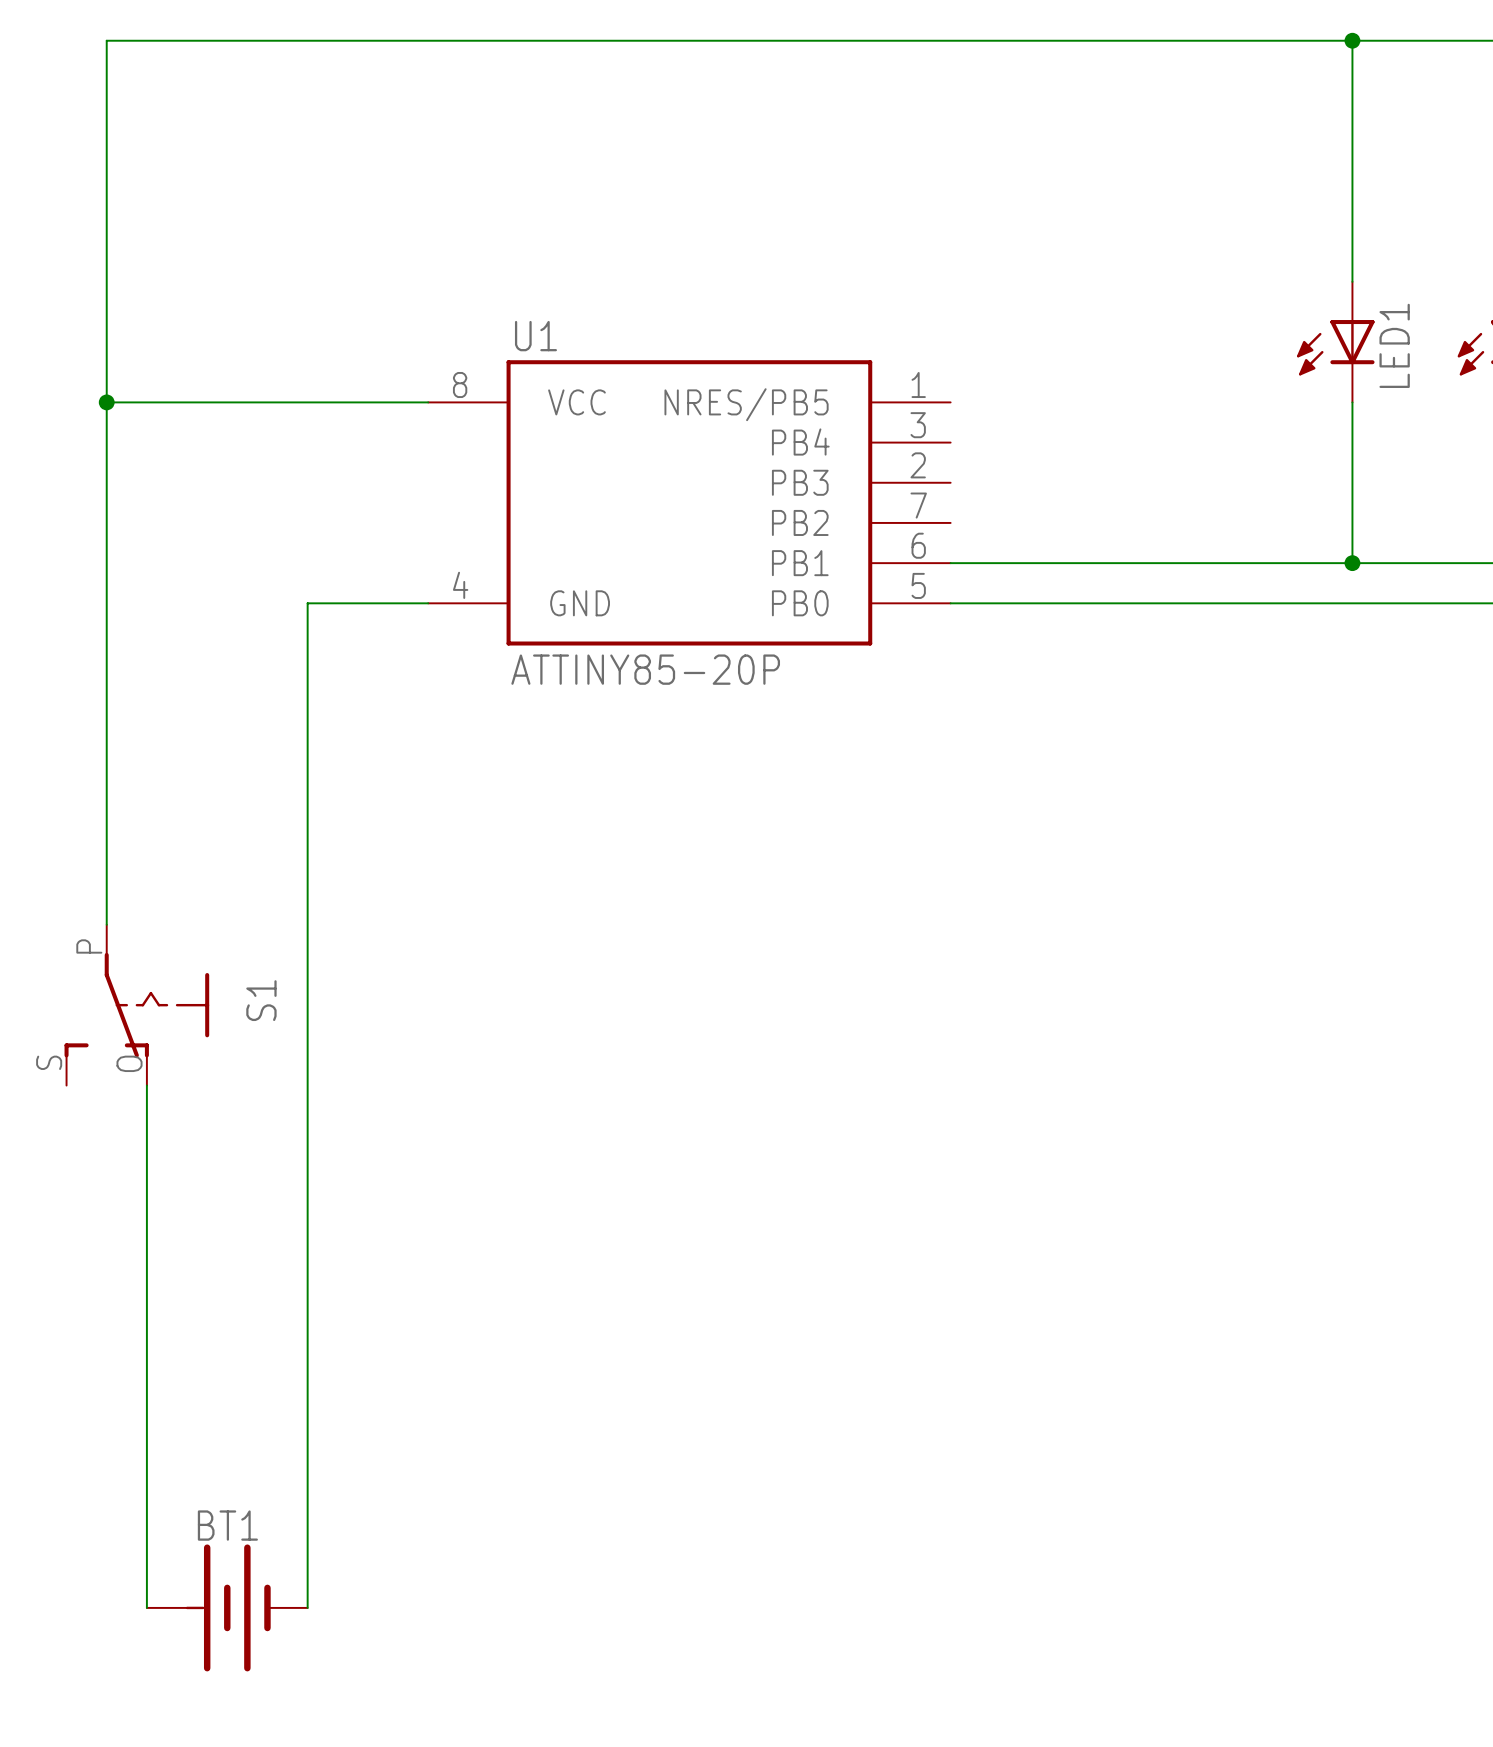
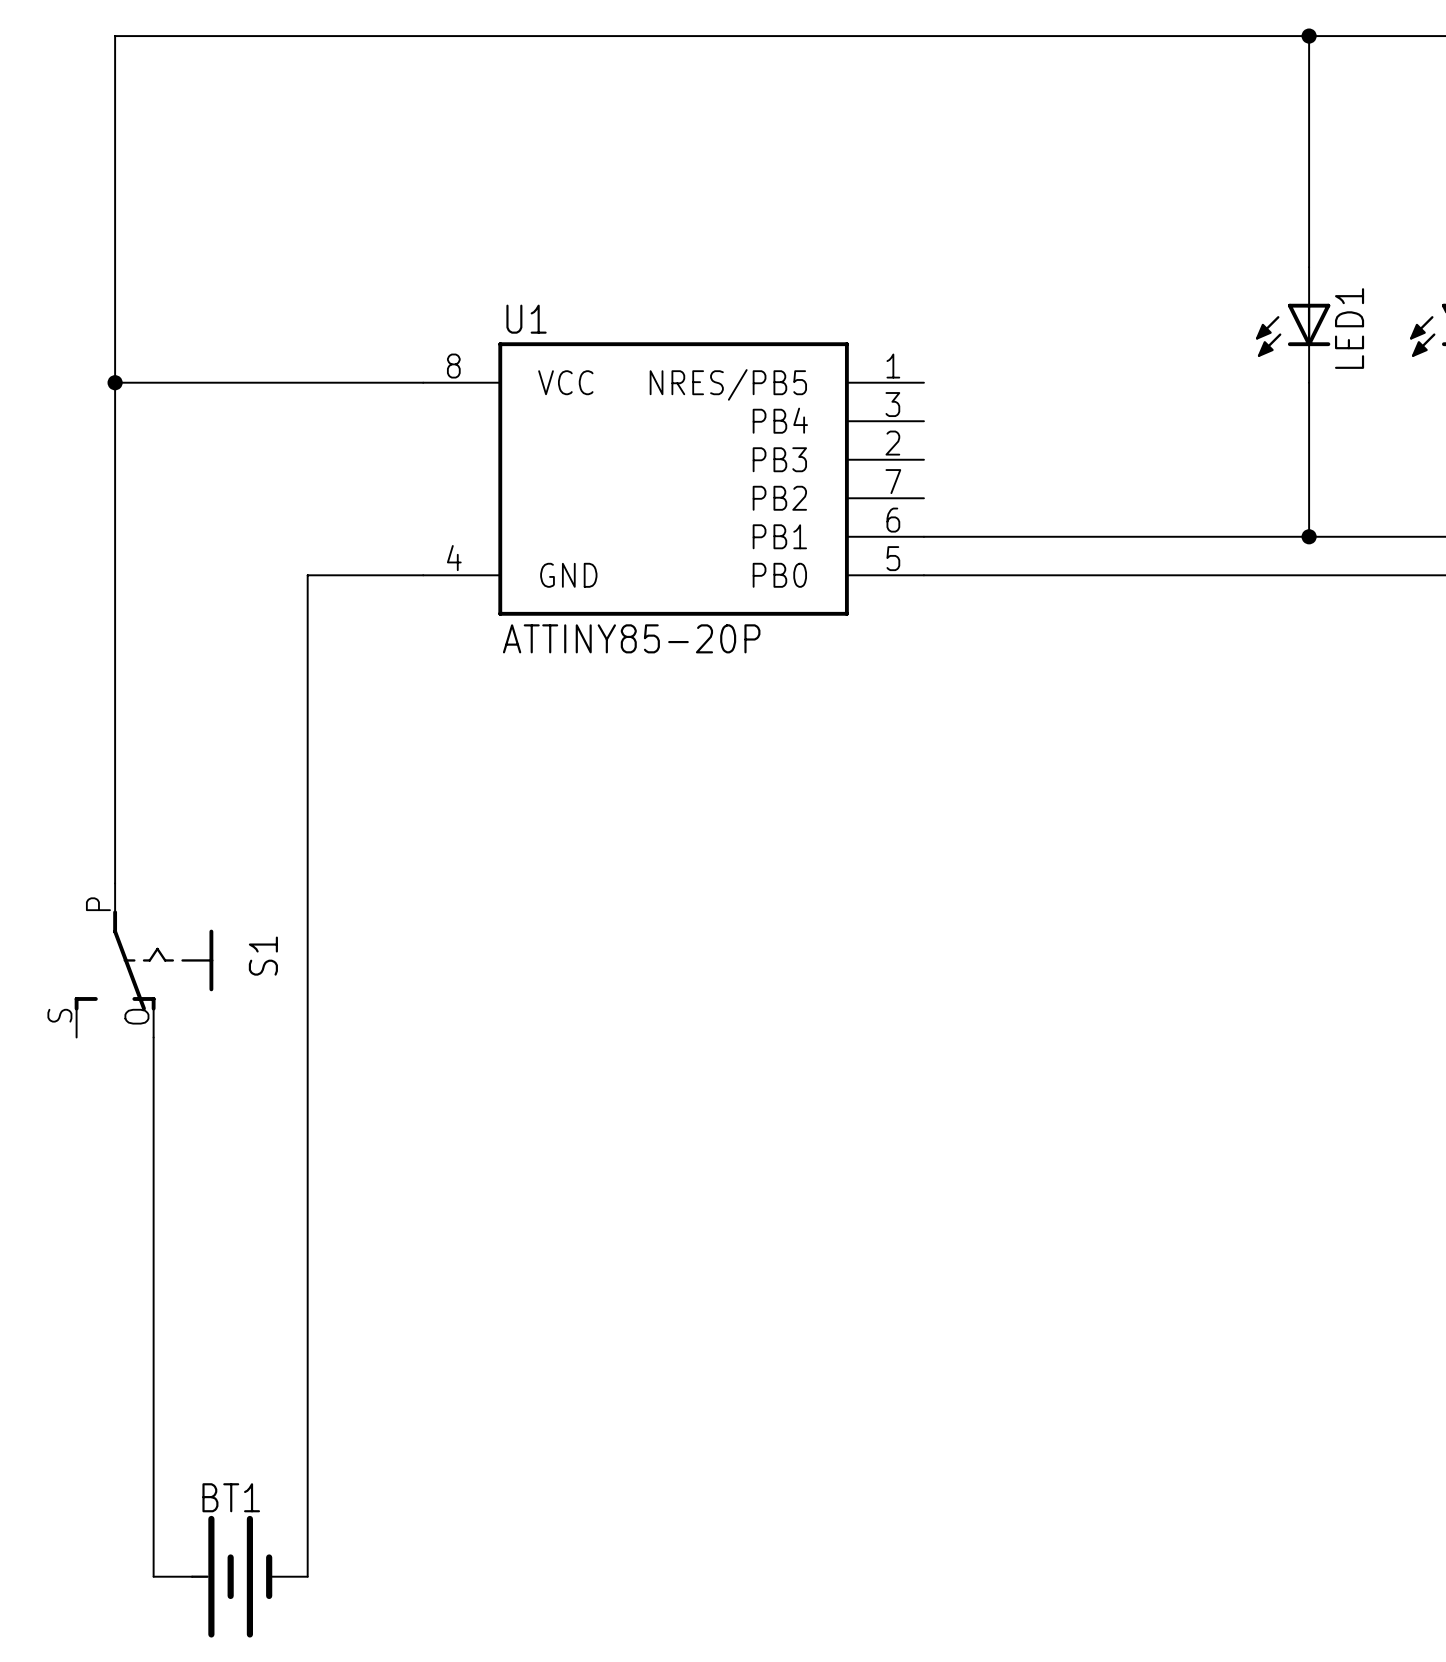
wire: none -> (153, 1538) (153, 1576)
BT1 position: (227, 1607) -> (230, 1576)
wire: none -> (307, 1538) (307, 1576)

